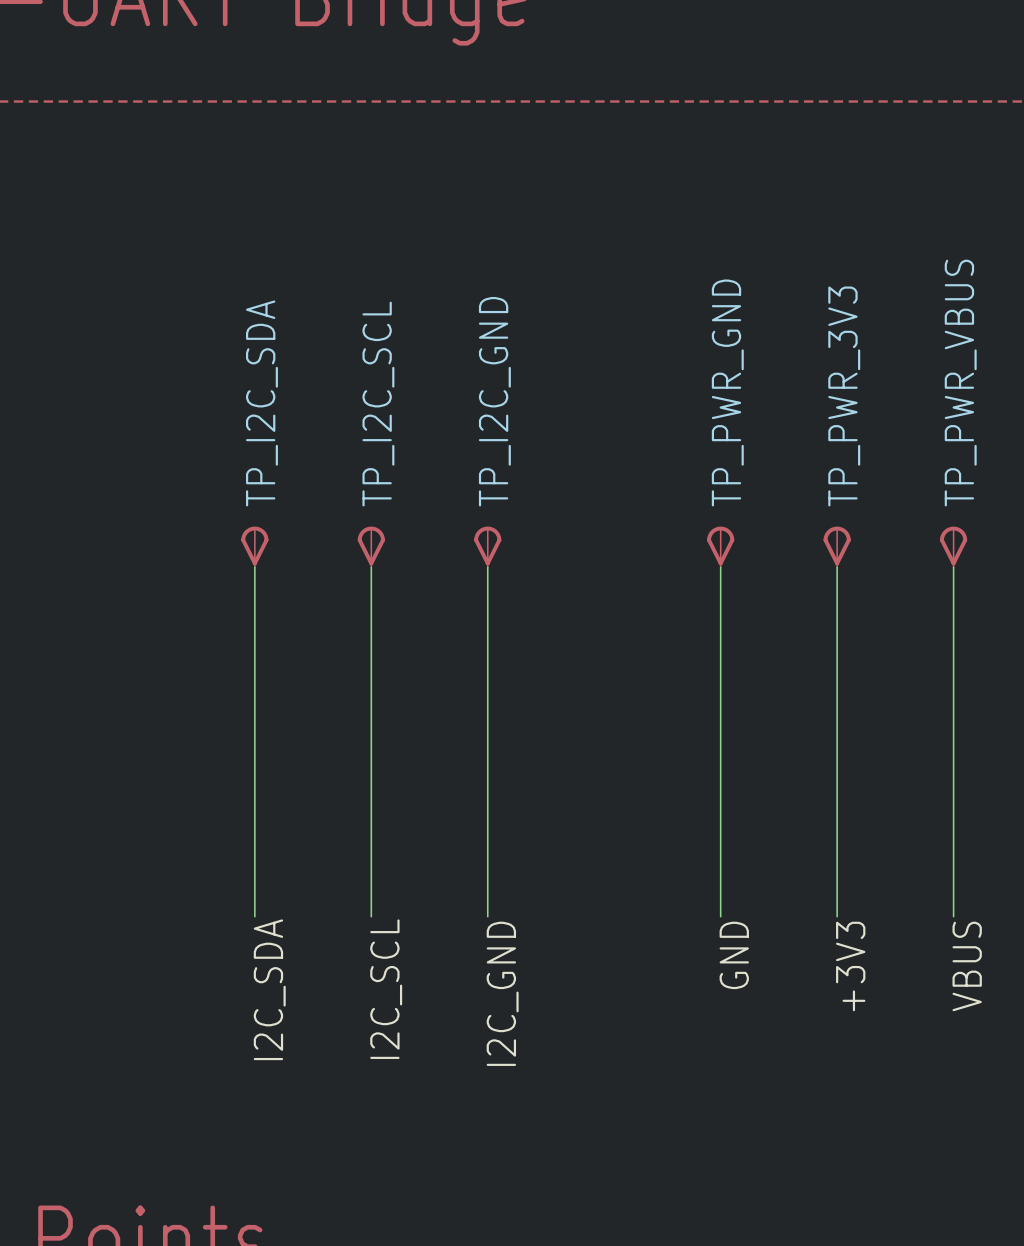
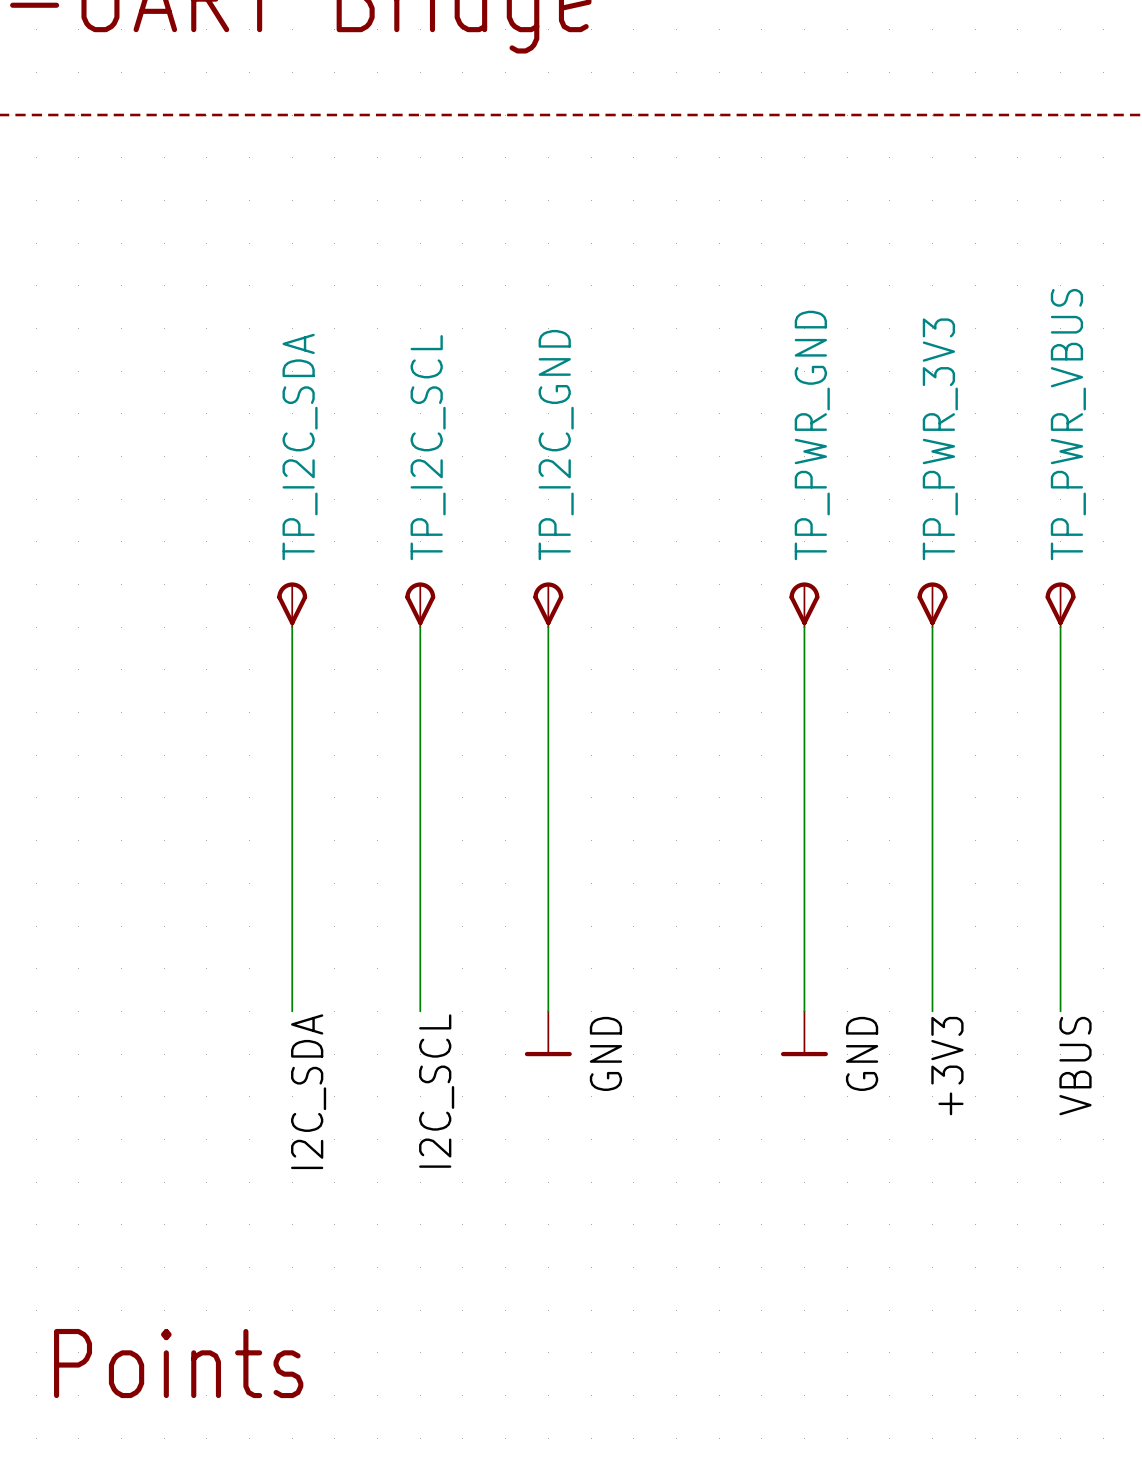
power symbol: none -> (548, 1033)
power symbol: none -> (804, 1033)
label: none -> GND (605, 1053)
label position: GND (734, 955) -> GND (862, 1053)
label: I2C_GND (502, 993) -> none

